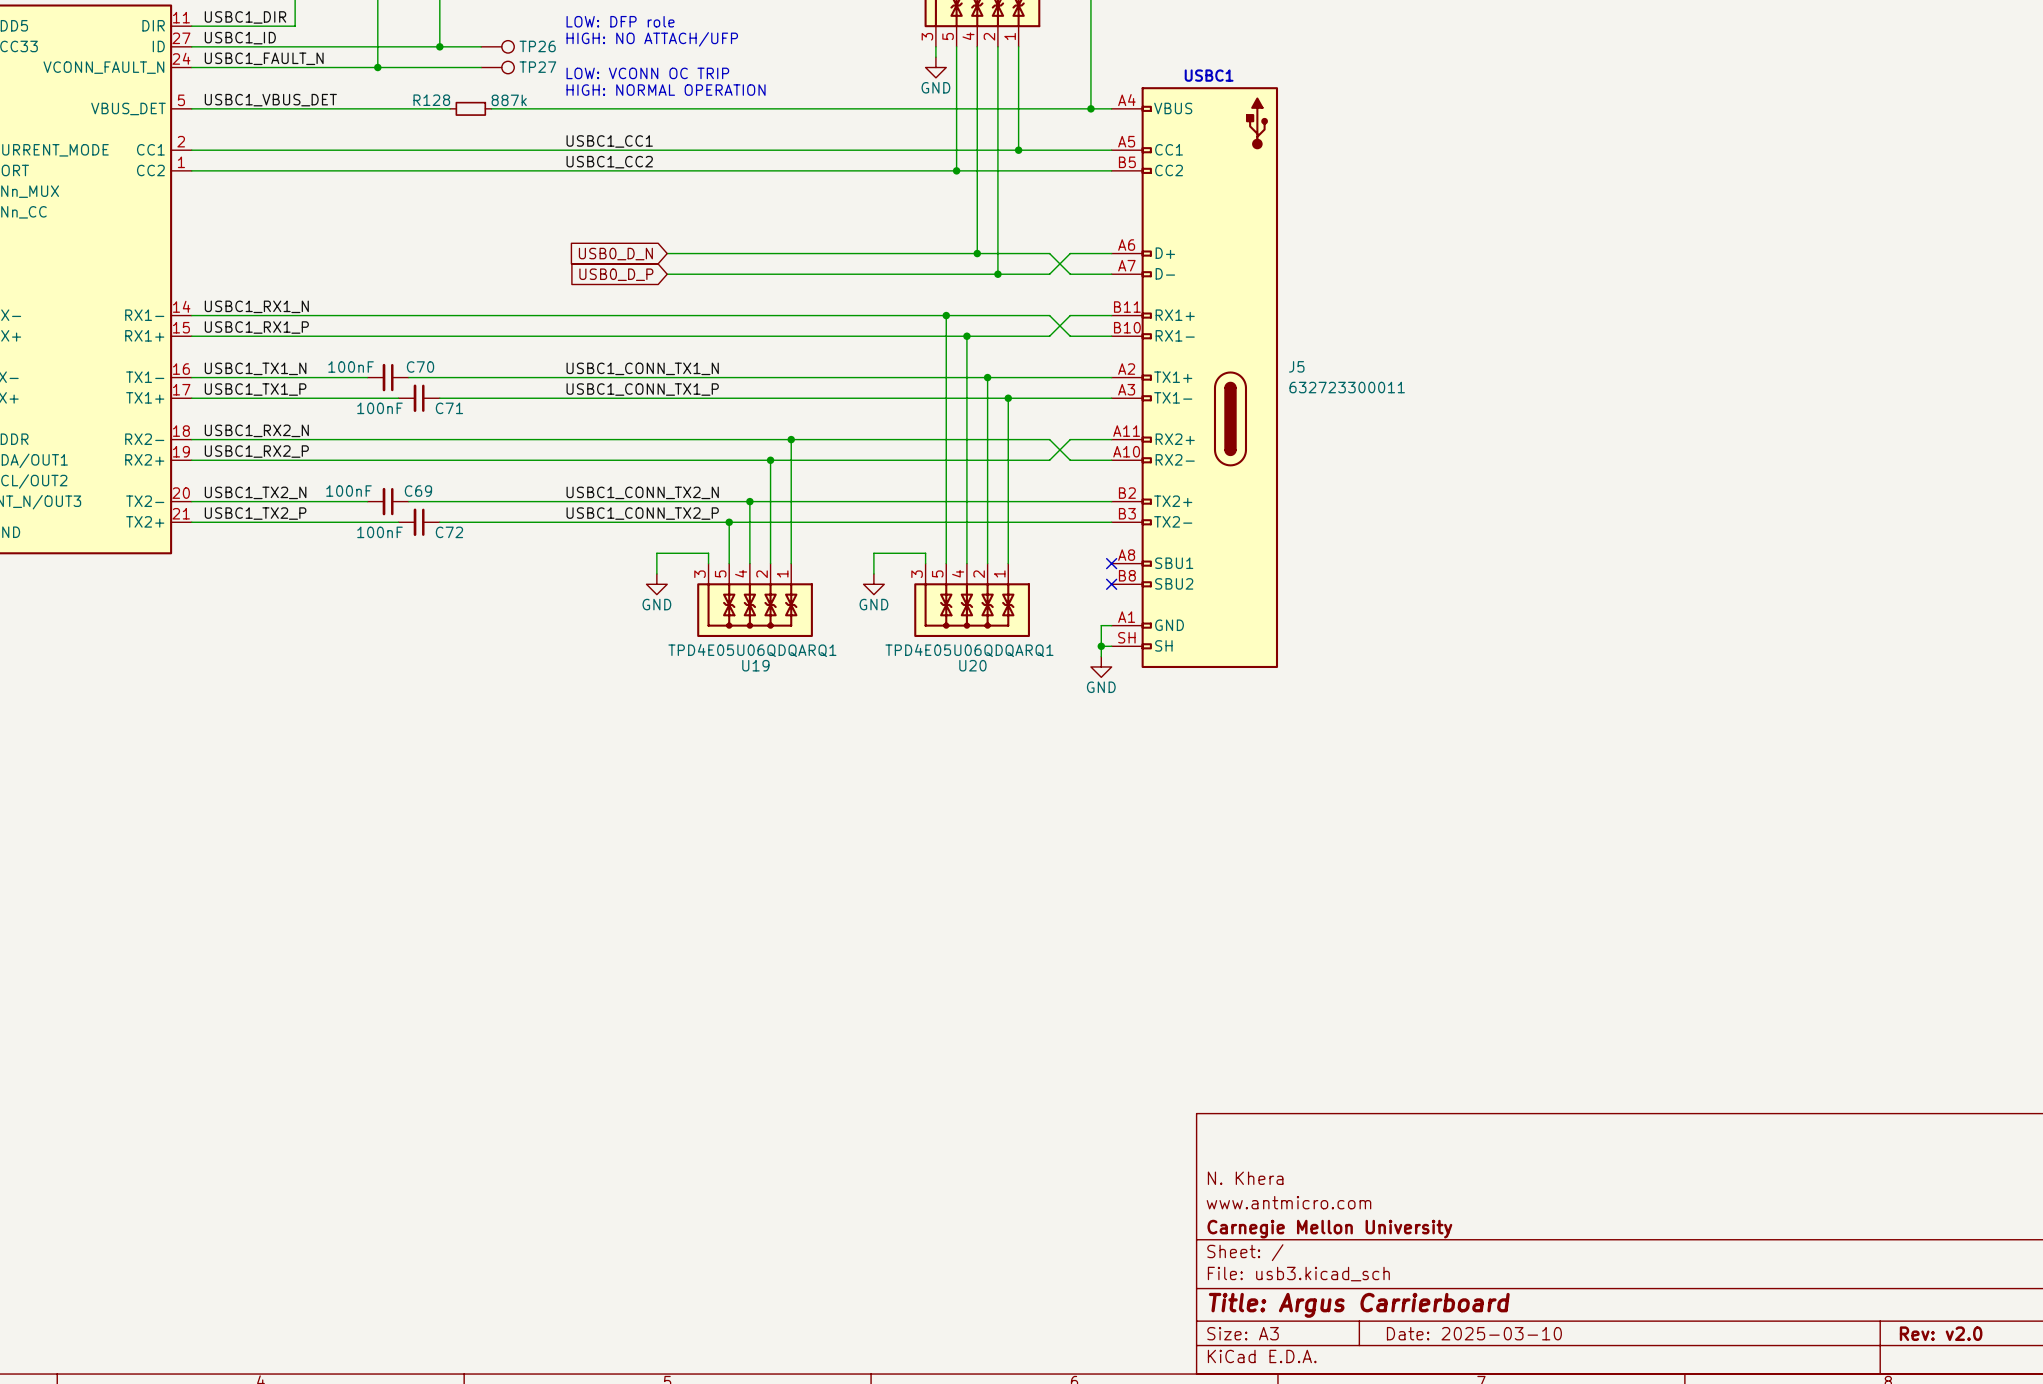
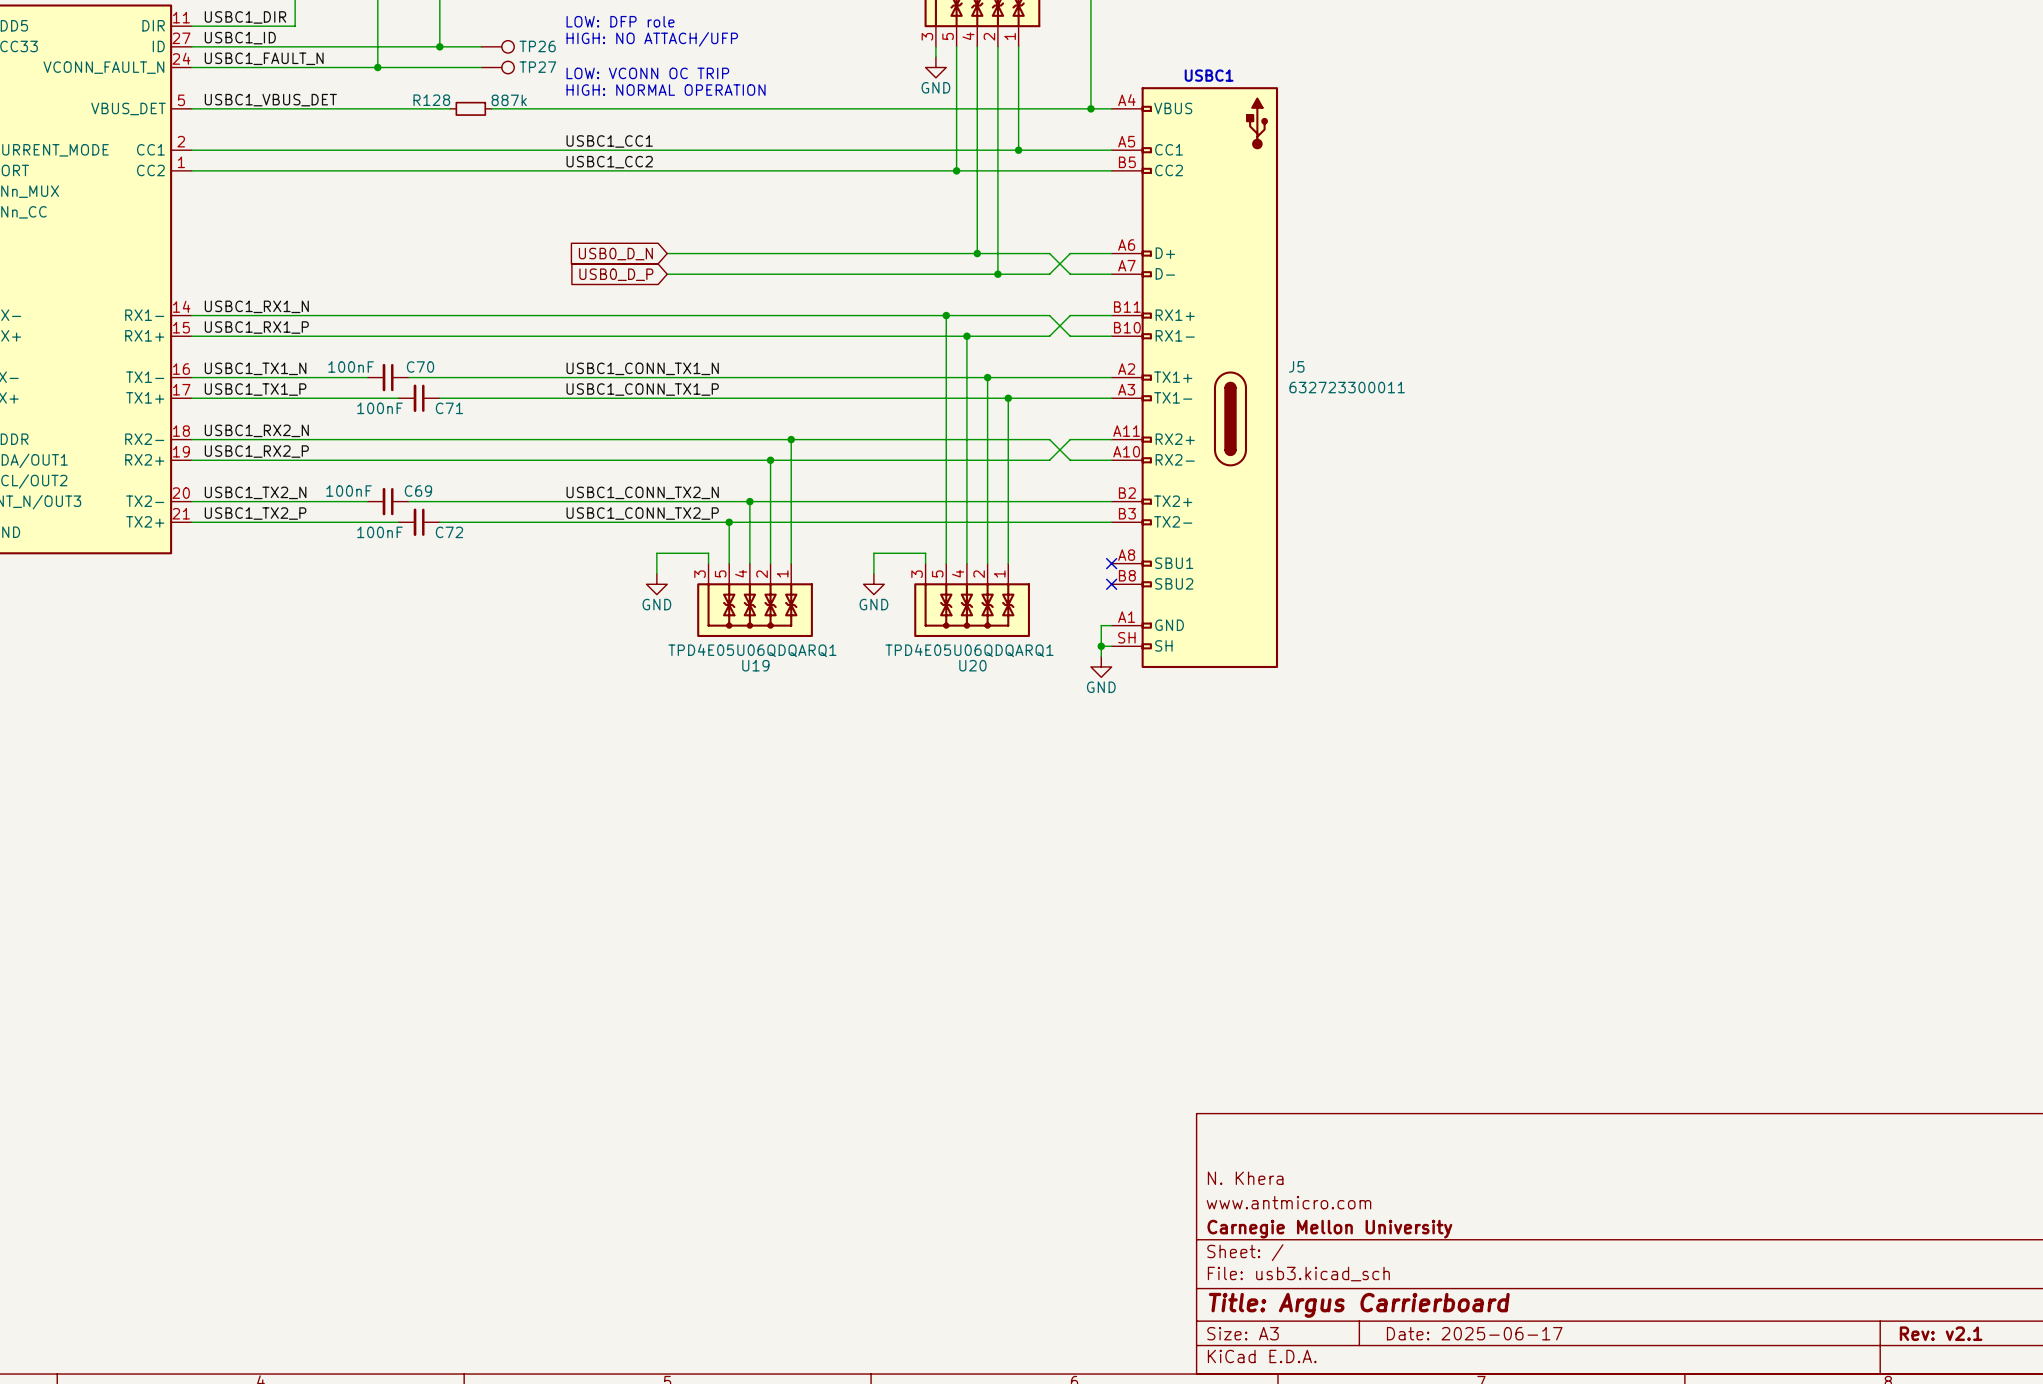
title block: Date: 2025-03-10 (1474, 1333) -> Date: 2025-06-17 (1474, 1333)
title block: Rev: v2.0 (1941, 1333) -> Rev: v2.1 (1941, 1333)

